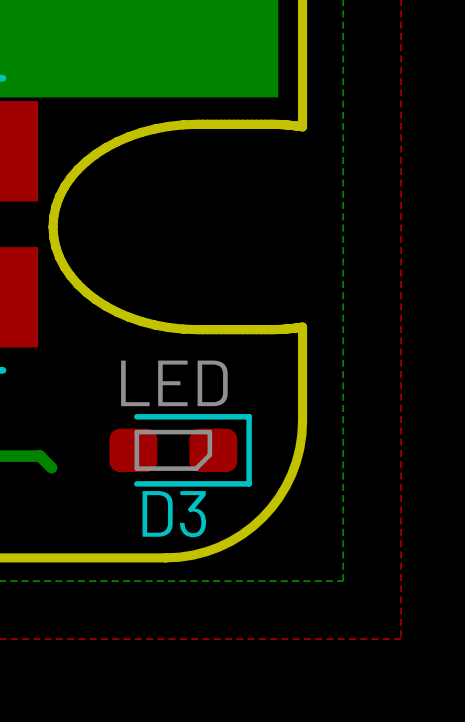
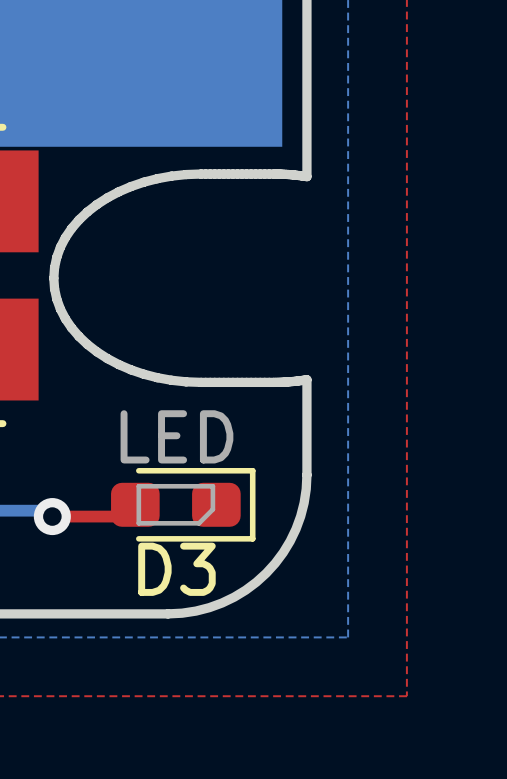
top track: none -> (135, 504) (123, 516) (52, 516)
via: none -> (52, 516)

